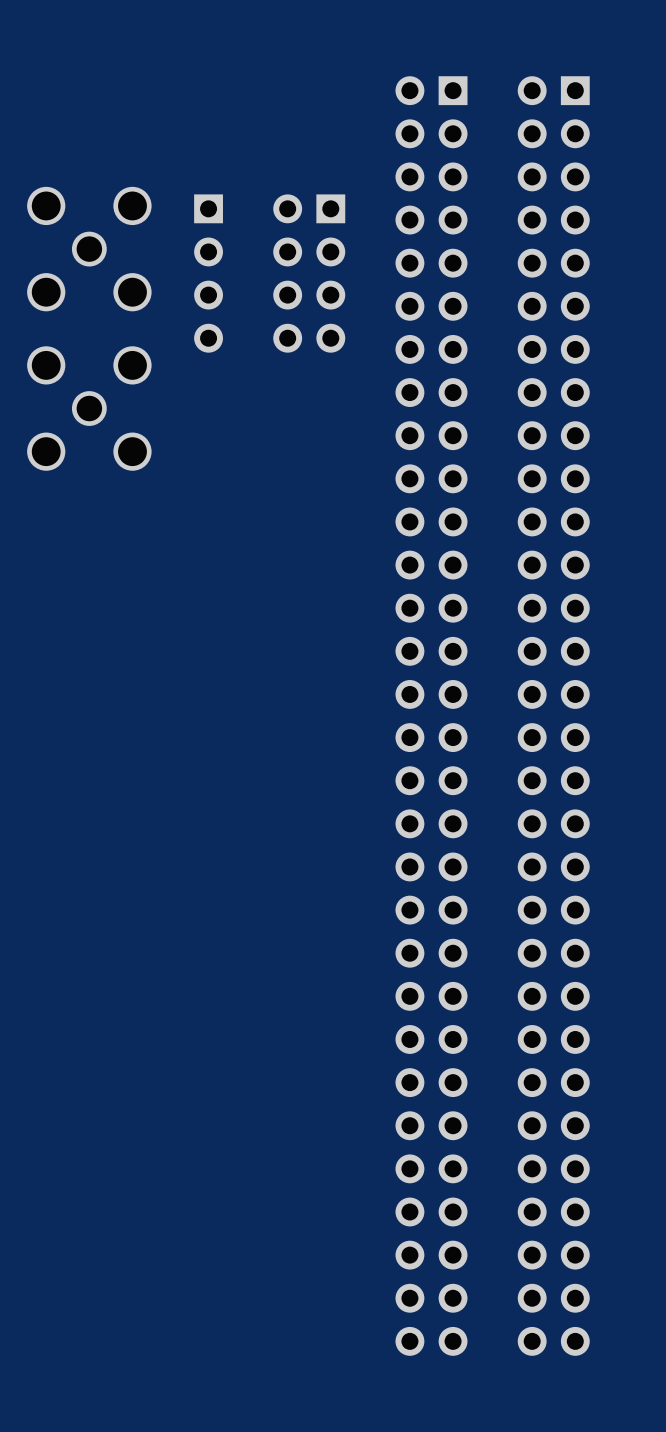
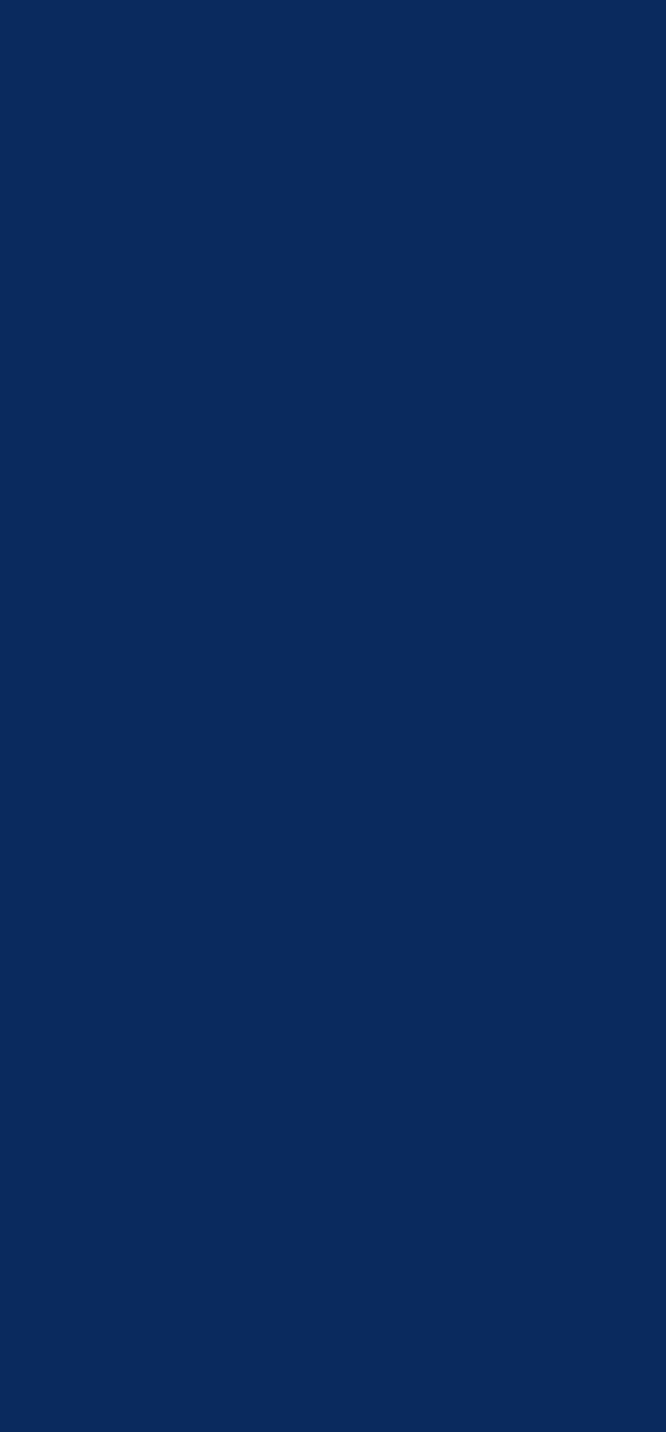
part: (89, 249) -> none
part: (208, 273) -> none
part: (309, 273) -> none
part: (89, 408) -> none
part: (431, 716) -> none
part: (553, 716) -> none

